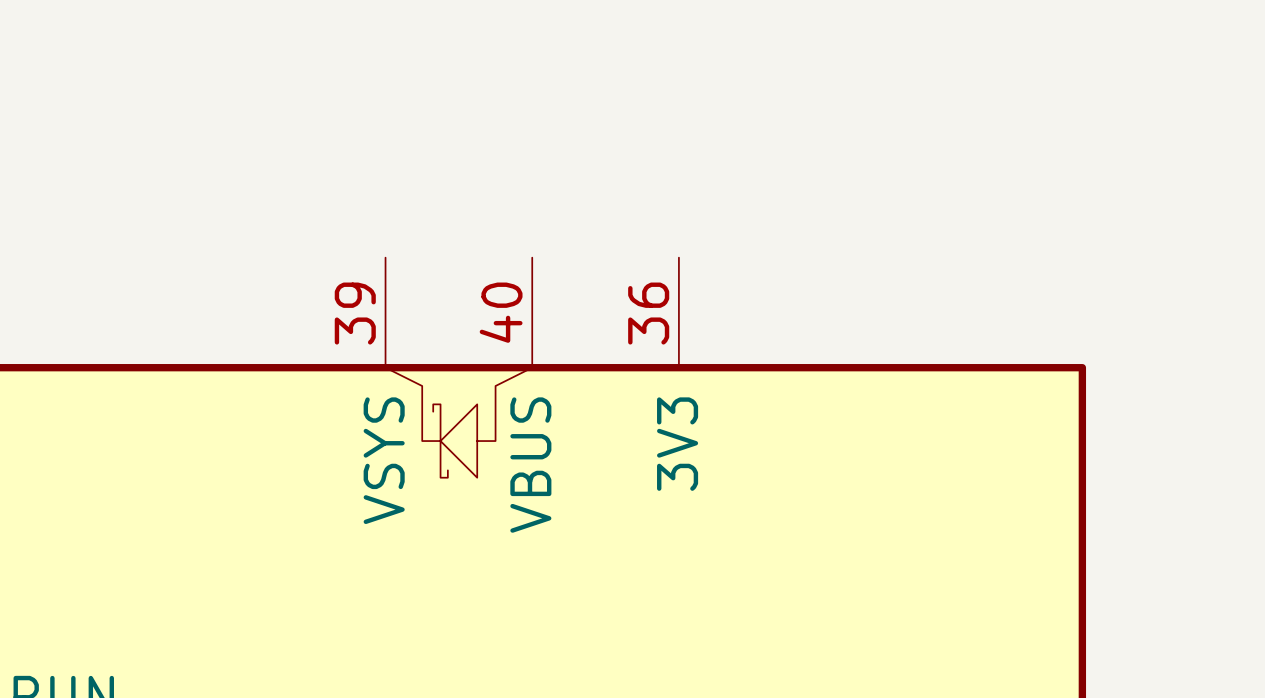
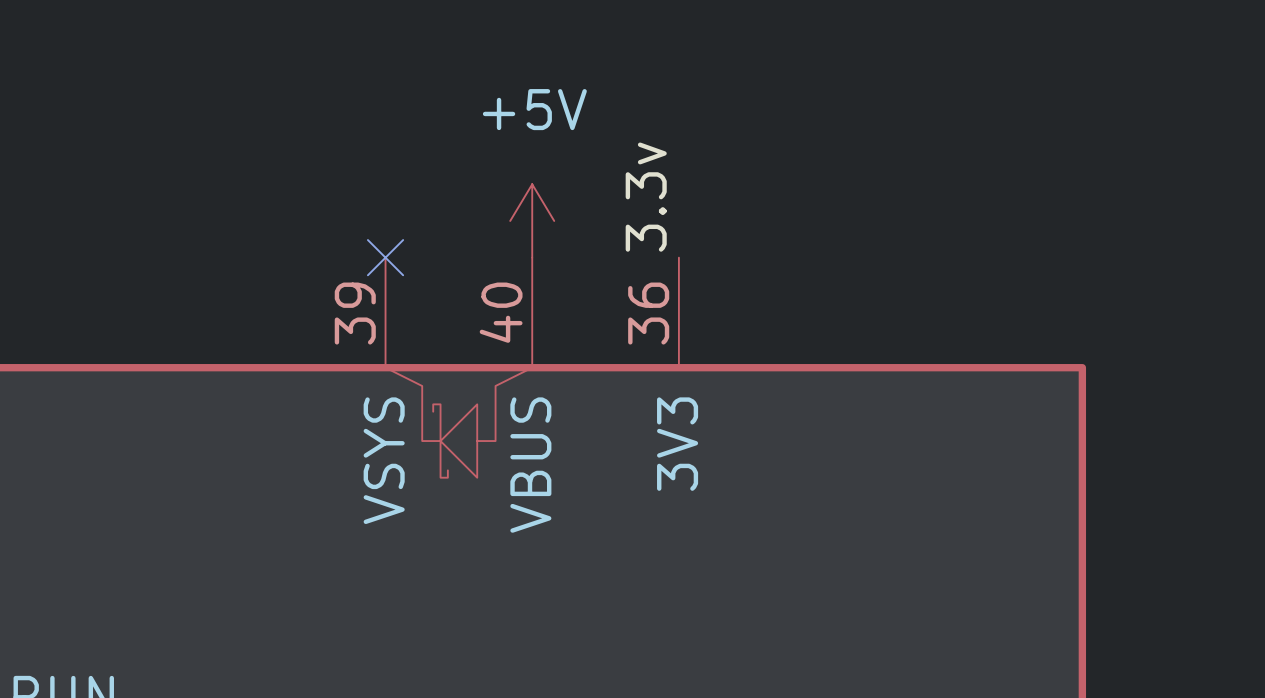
label: none -> 3.3v (646, 197)
power symbol: none -> +5V (532, 220)
no-connect mark: none -> (385, 257)

